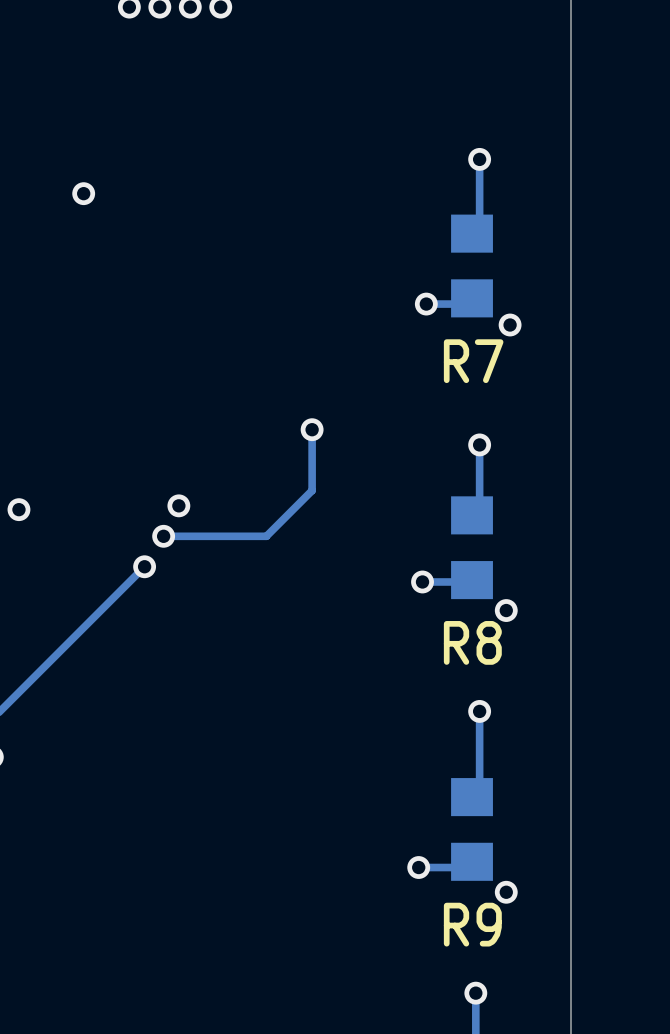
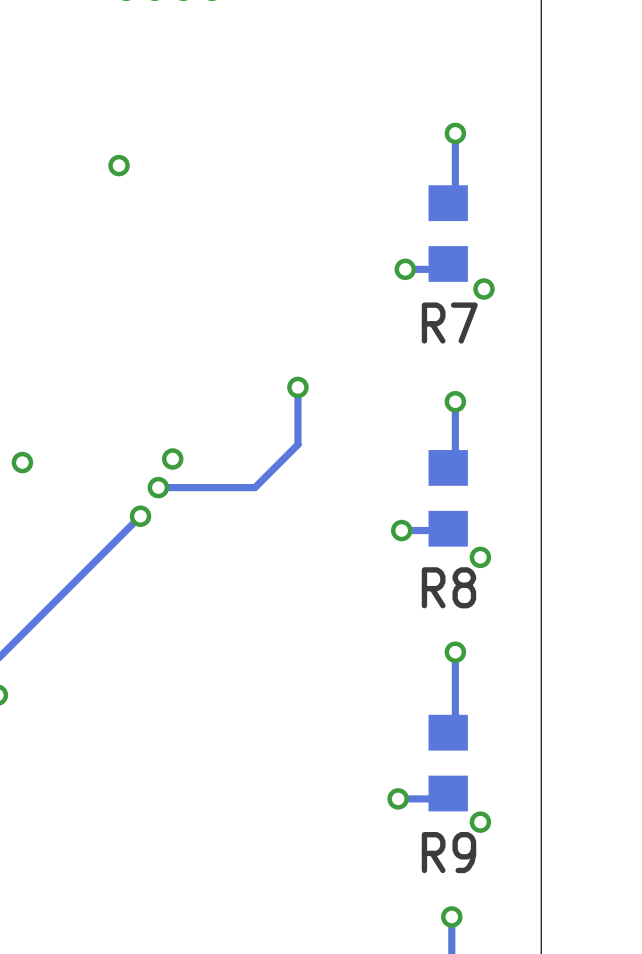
via position: (83, 193) -> (119, 165)

